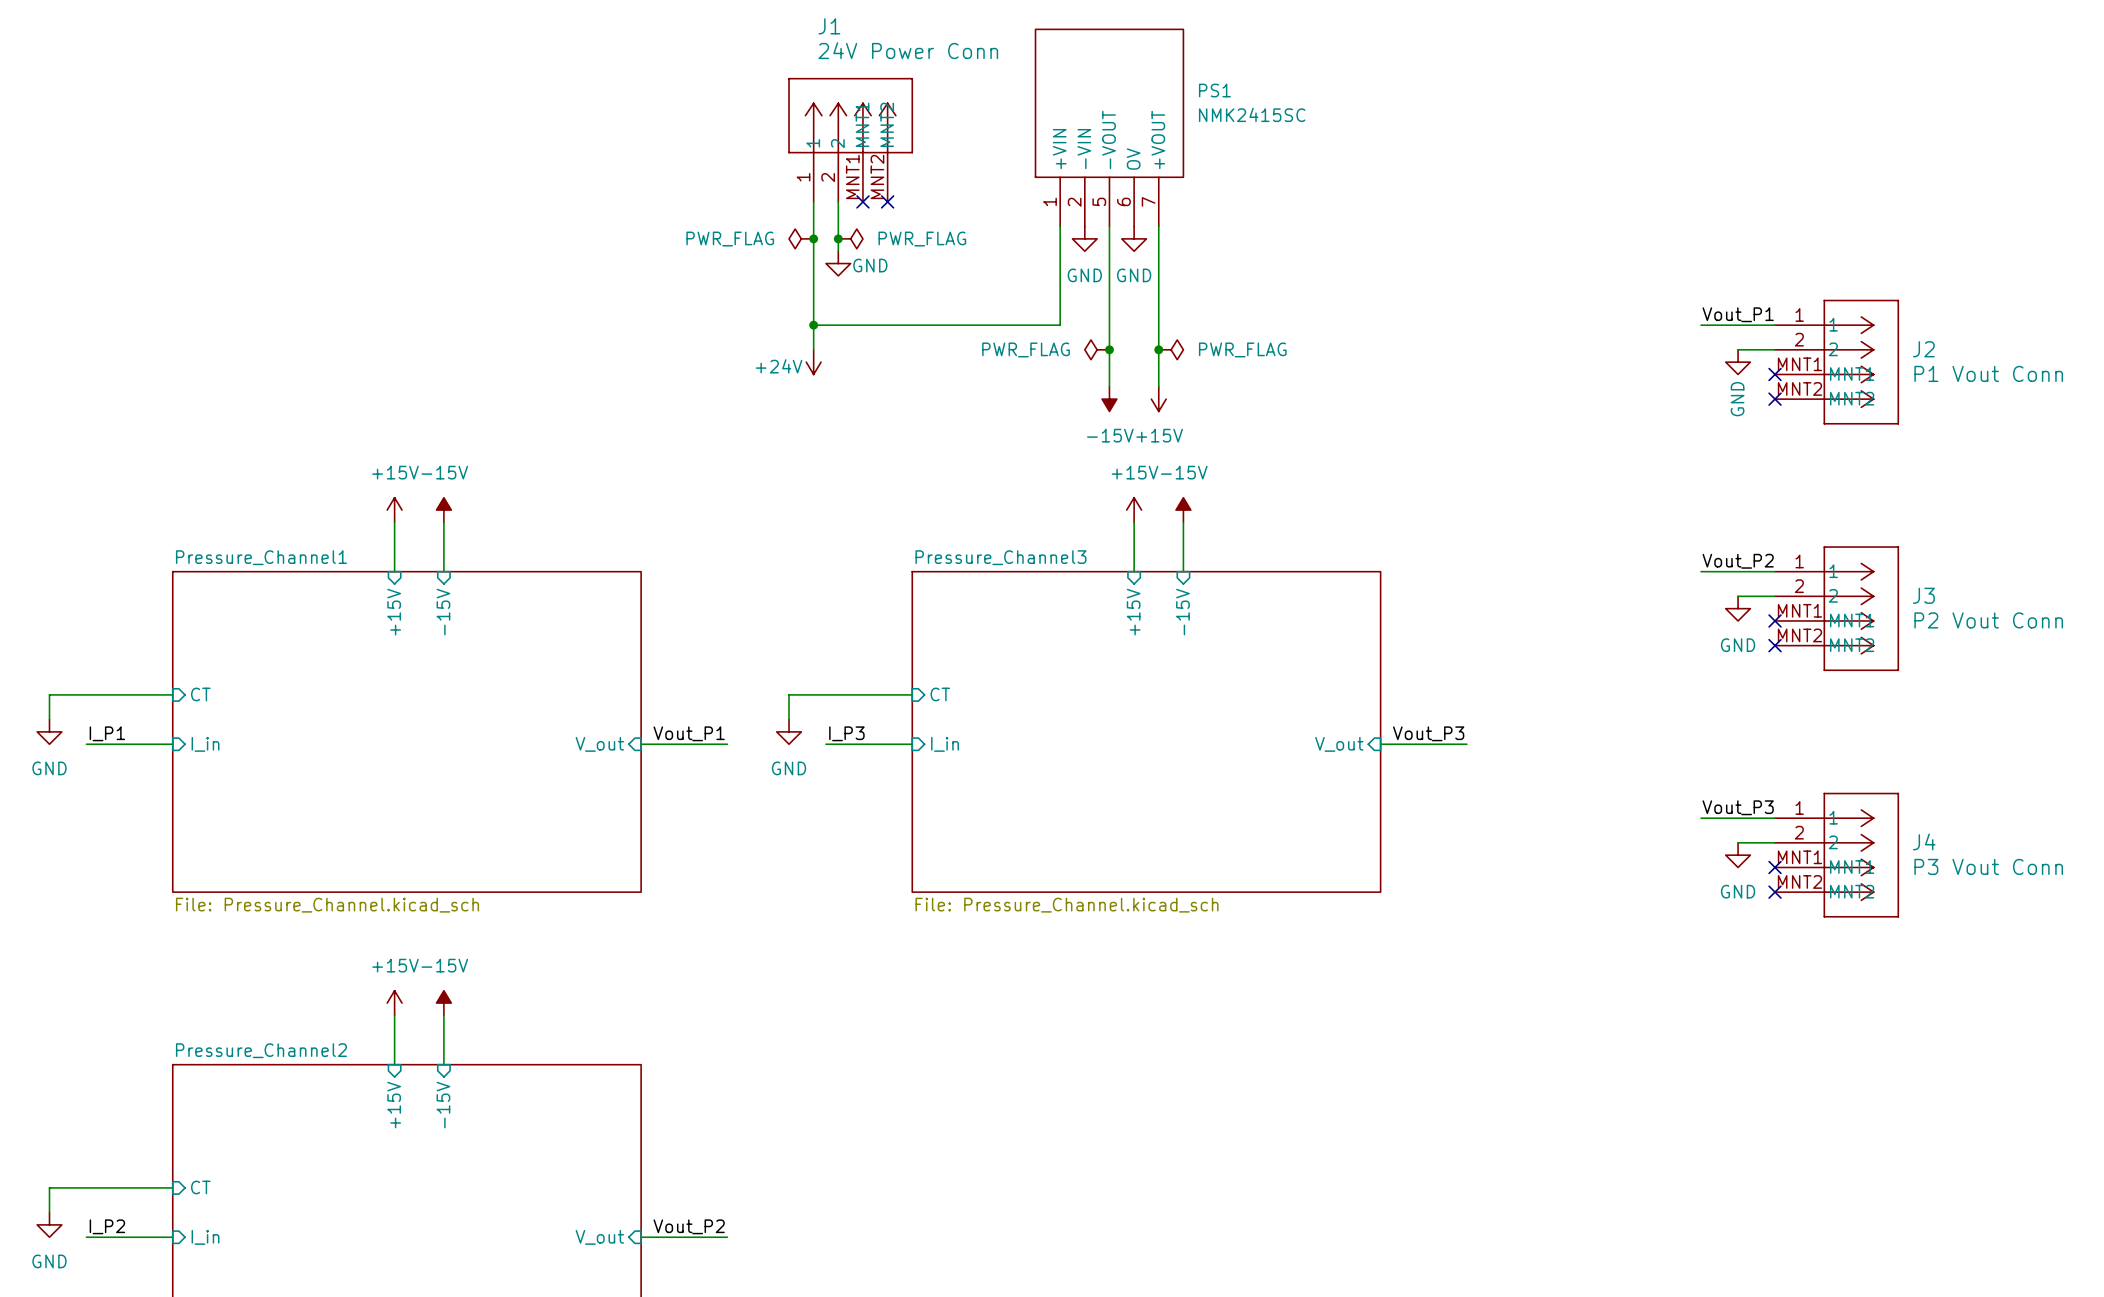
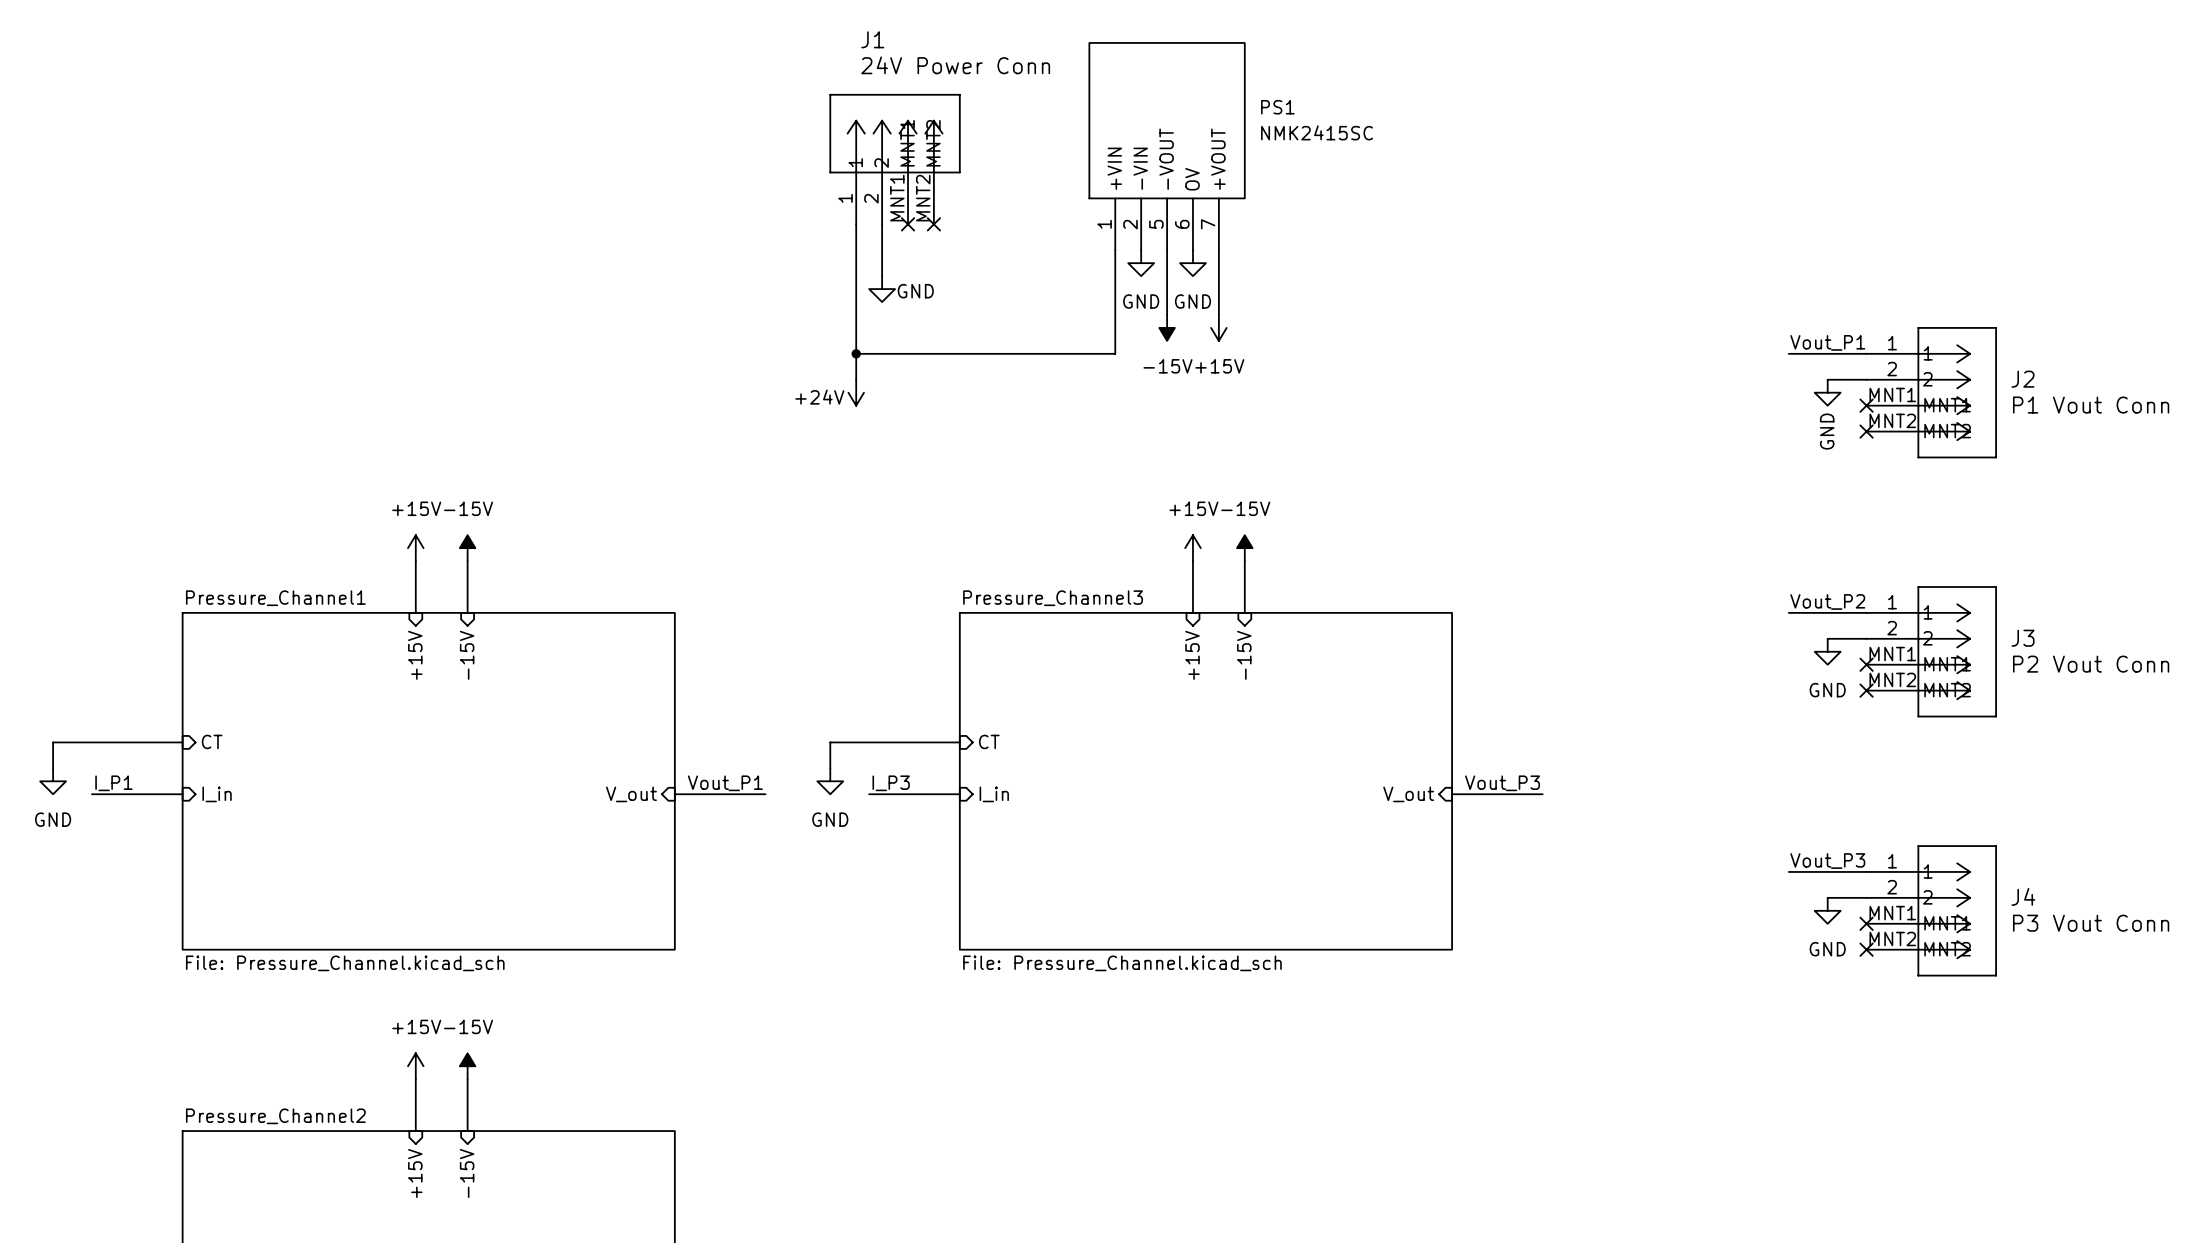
power symbol: PWR_FLAG (801, 238) -> none
junction: (813, 238) -> none
junction: (838, 238) -> none
power symbol: PWR_FLAG (850, 238) -> none
wire: (1109, 288) (1109, 386) -> none
wire: (1158, 288) (1158, 386) -> none
power symbol: PWR_FLAG (1097, 349) -> none
junction: (1109, 349) -> none
junction: (1158, 349) -> none
power symbol: PWR_FLAG (1171, 349) -> none
power symbol position: -15V (1109, 399) -> -15V (1167, 327)
power symbol position: +15V (1158, 399) -> +15V (1218, 327)

